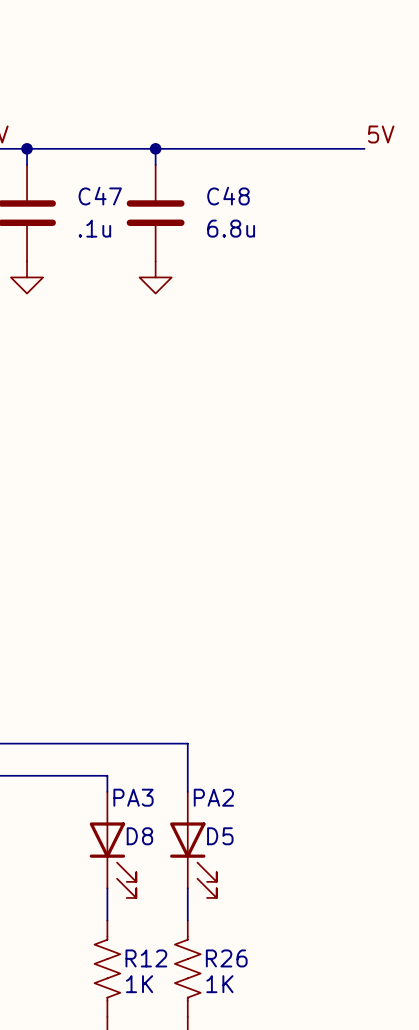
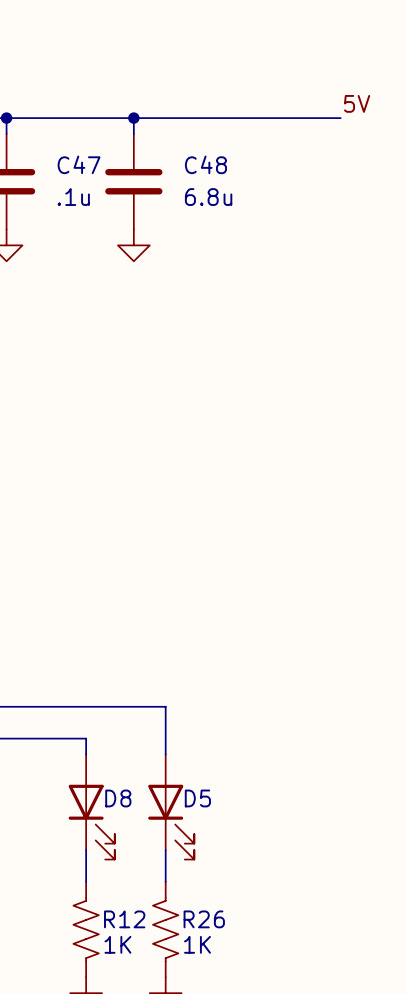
D8 value: PA3 (133, 797) -> none
D5 value: PA2 (213, 797) -> none

